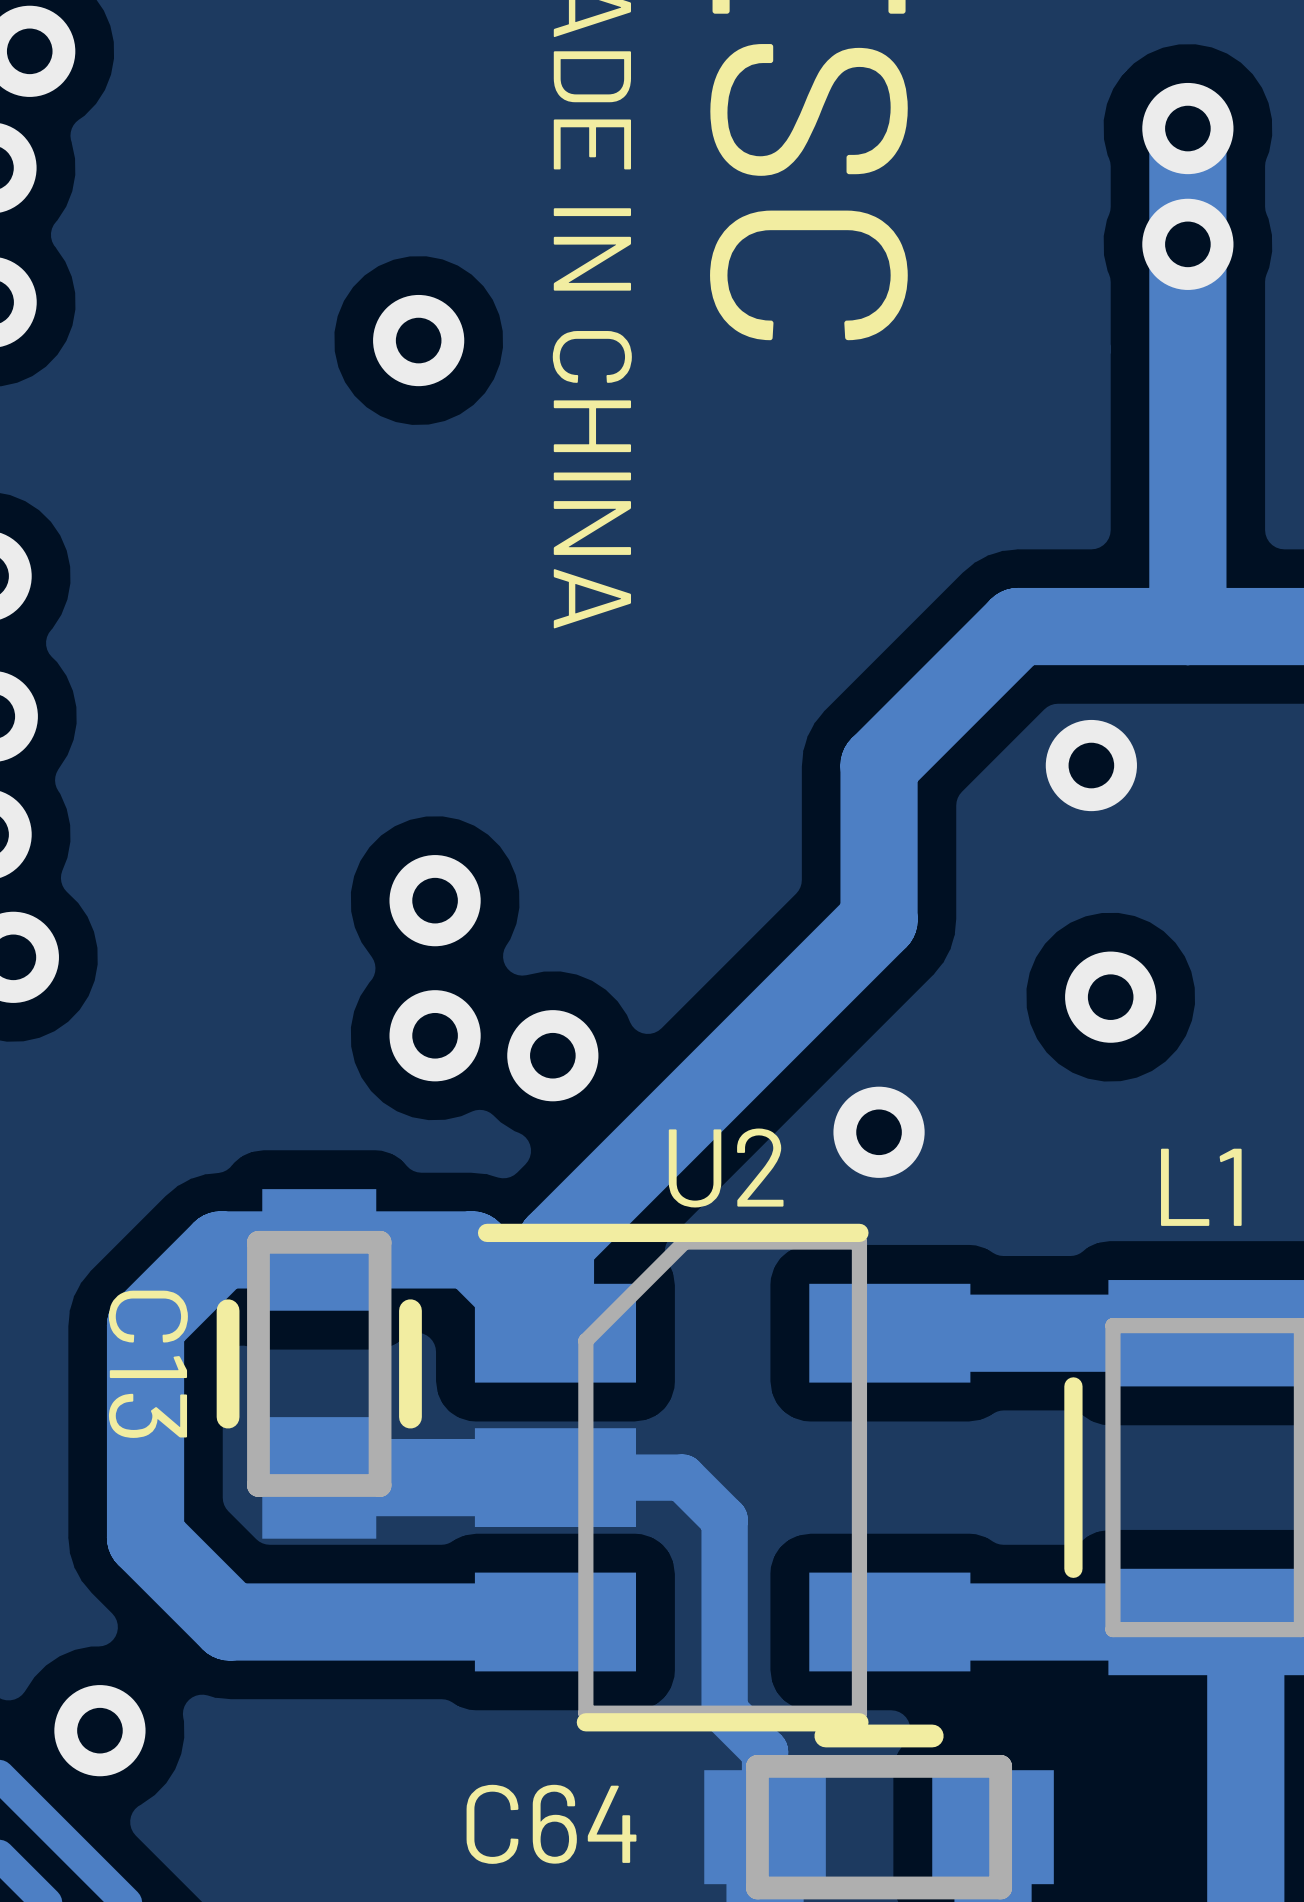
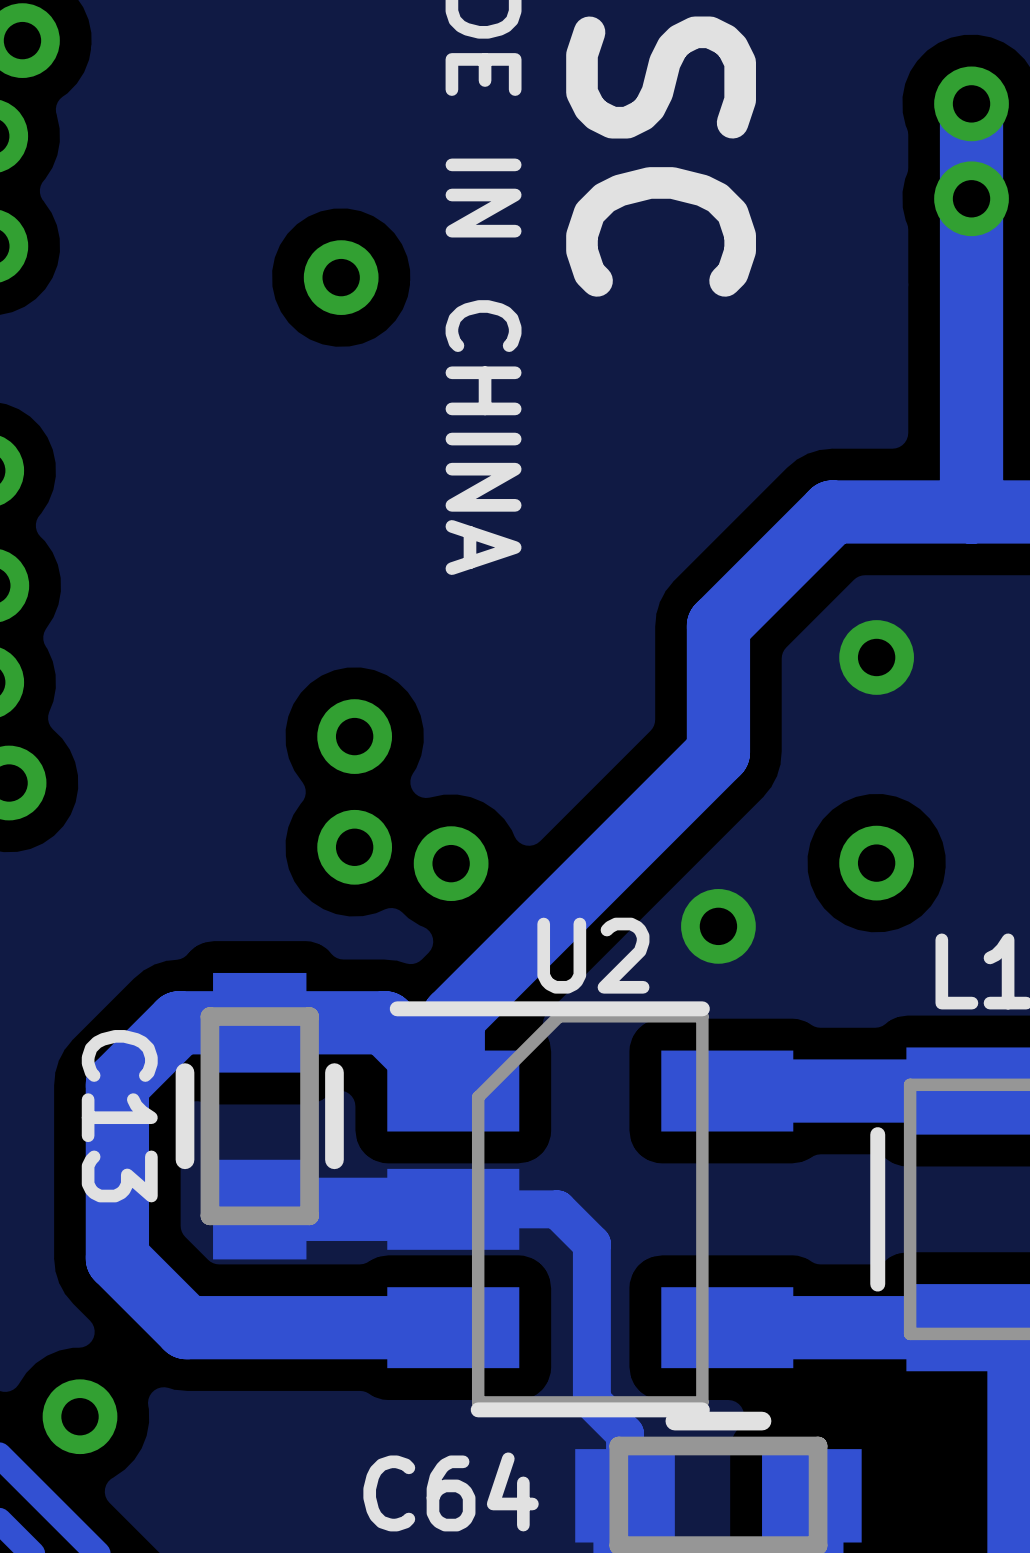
via position: (1091, 765) -> (876, 657)
via position: (1110, 997) -> (876, 863)

